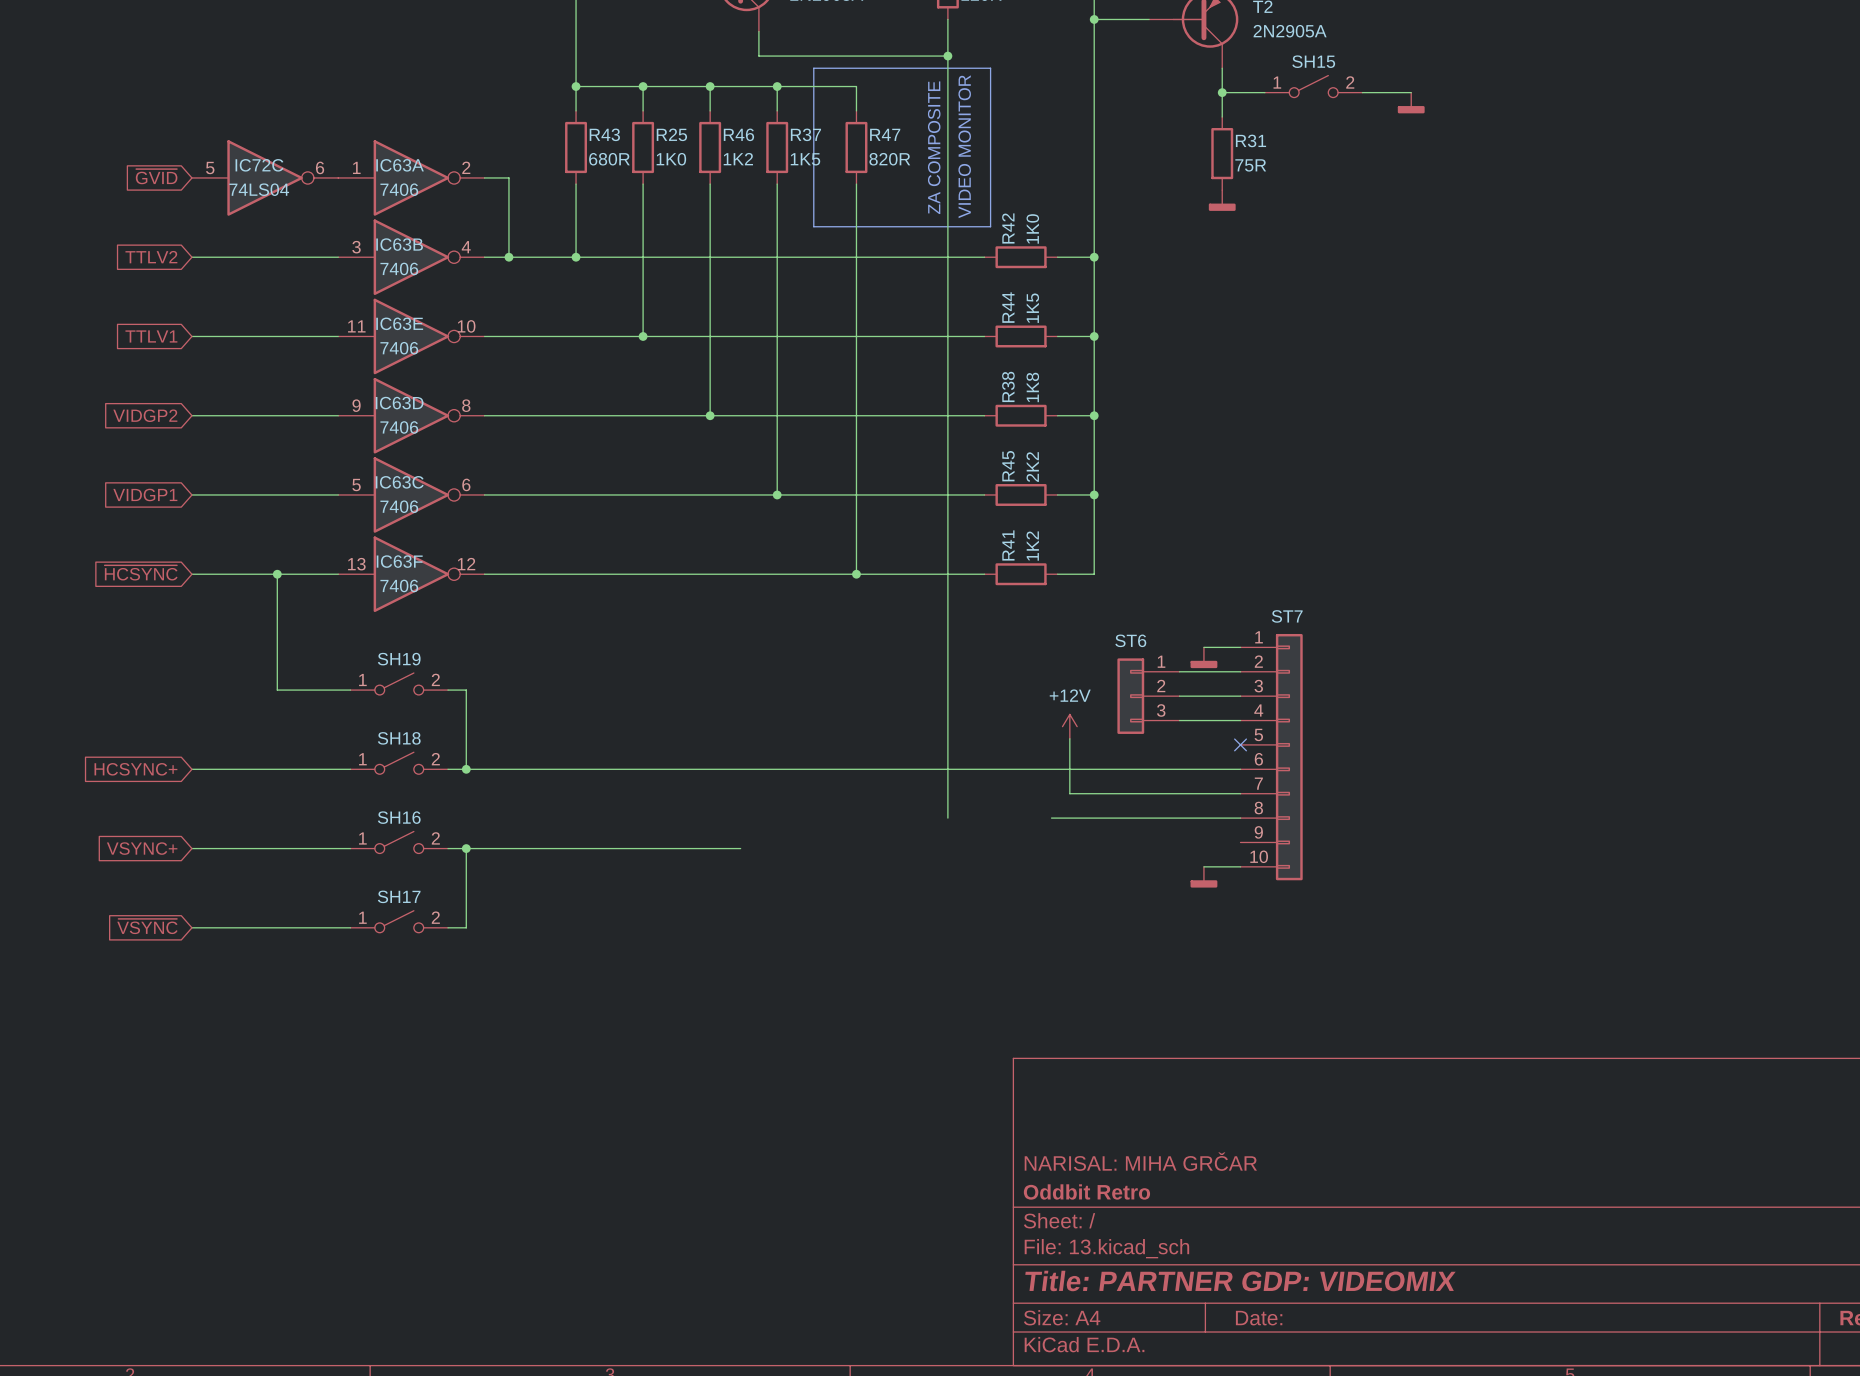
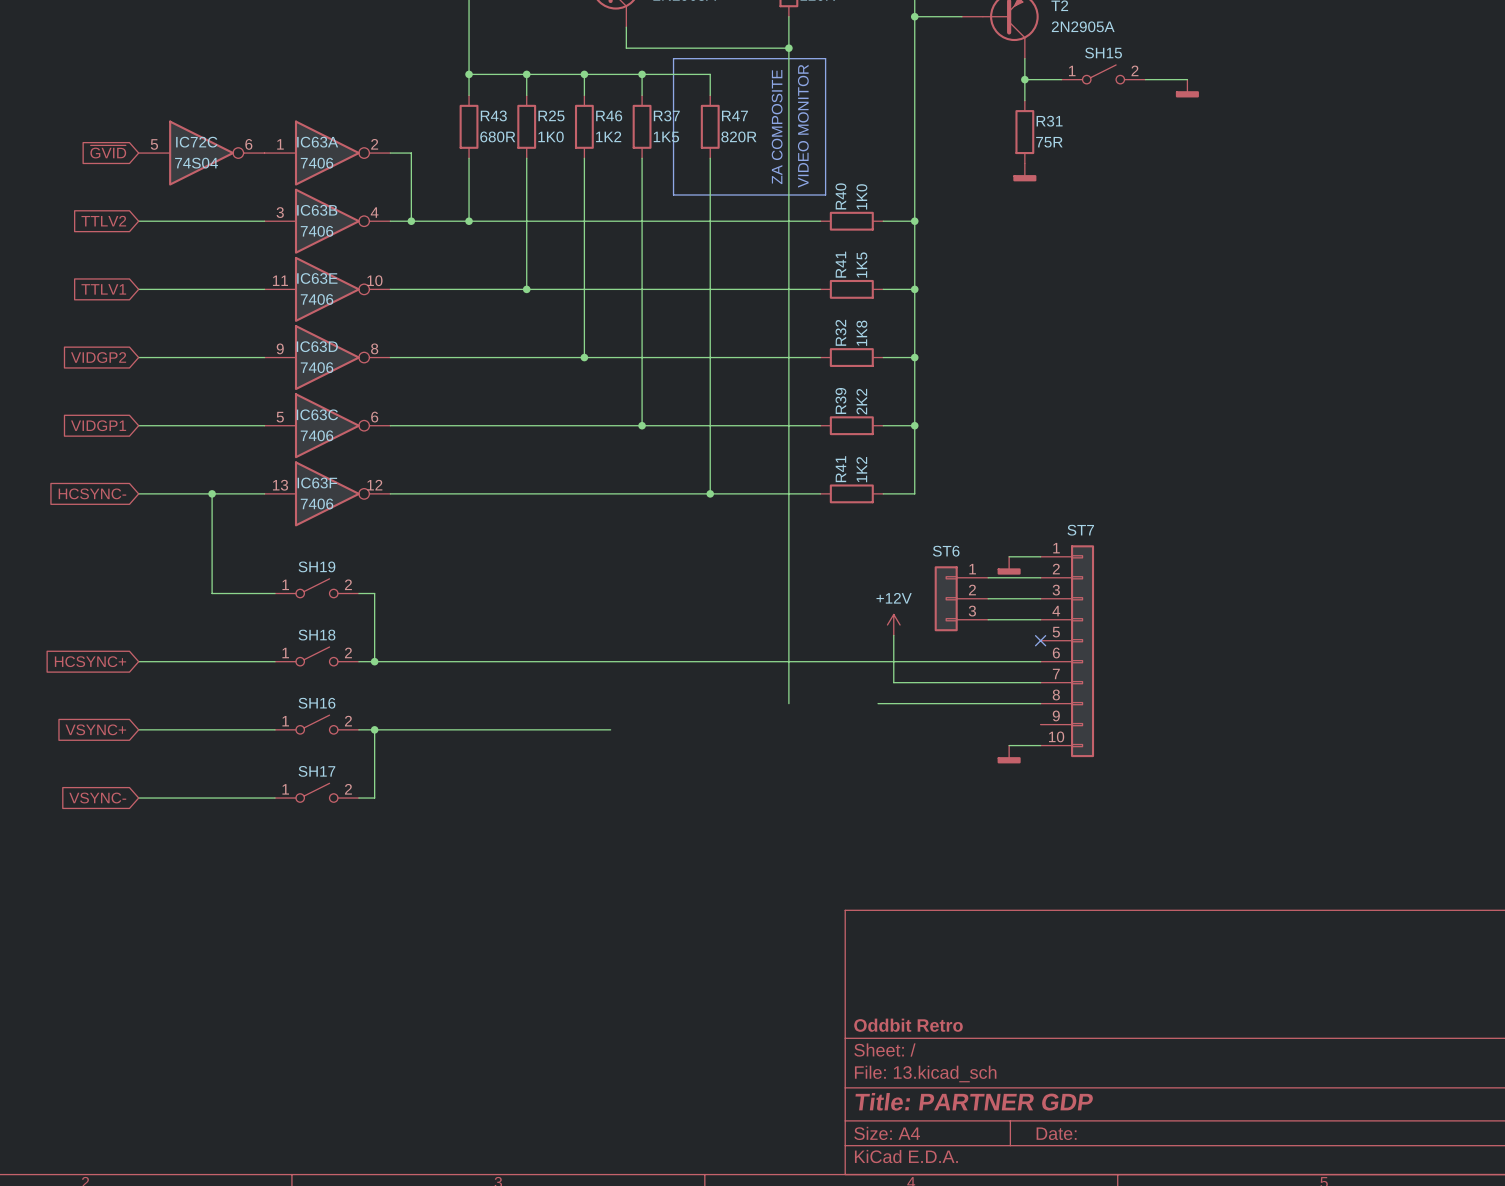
IC72C value: 74LS04 (259, 189) -> 74S04 (196, 163)
R42 name: R42 (1008, 228) -> R40 (840, 196)
R44 name: R44 (1008, 307) -> R41 (840, 264)
R38 name: R38 (1008, 386) -> R32 (840, 332)
R45 name: R45 (1008, 466) -> R39 (840, 400)
global label: ~{HCSYNC} (141, 572) -> HCSYNC- (92, 493)
global label: ~{VSYNC} (147, 926) -> VSYNC- (97, 798)
title block: NARISAL: MIHA GRČAR (1140, 1161) -> none
title block: Title: PARTNER GDP: VIDEOMIX (1240, 1280) -> Title: PARTNER GDP (974, 1101)

